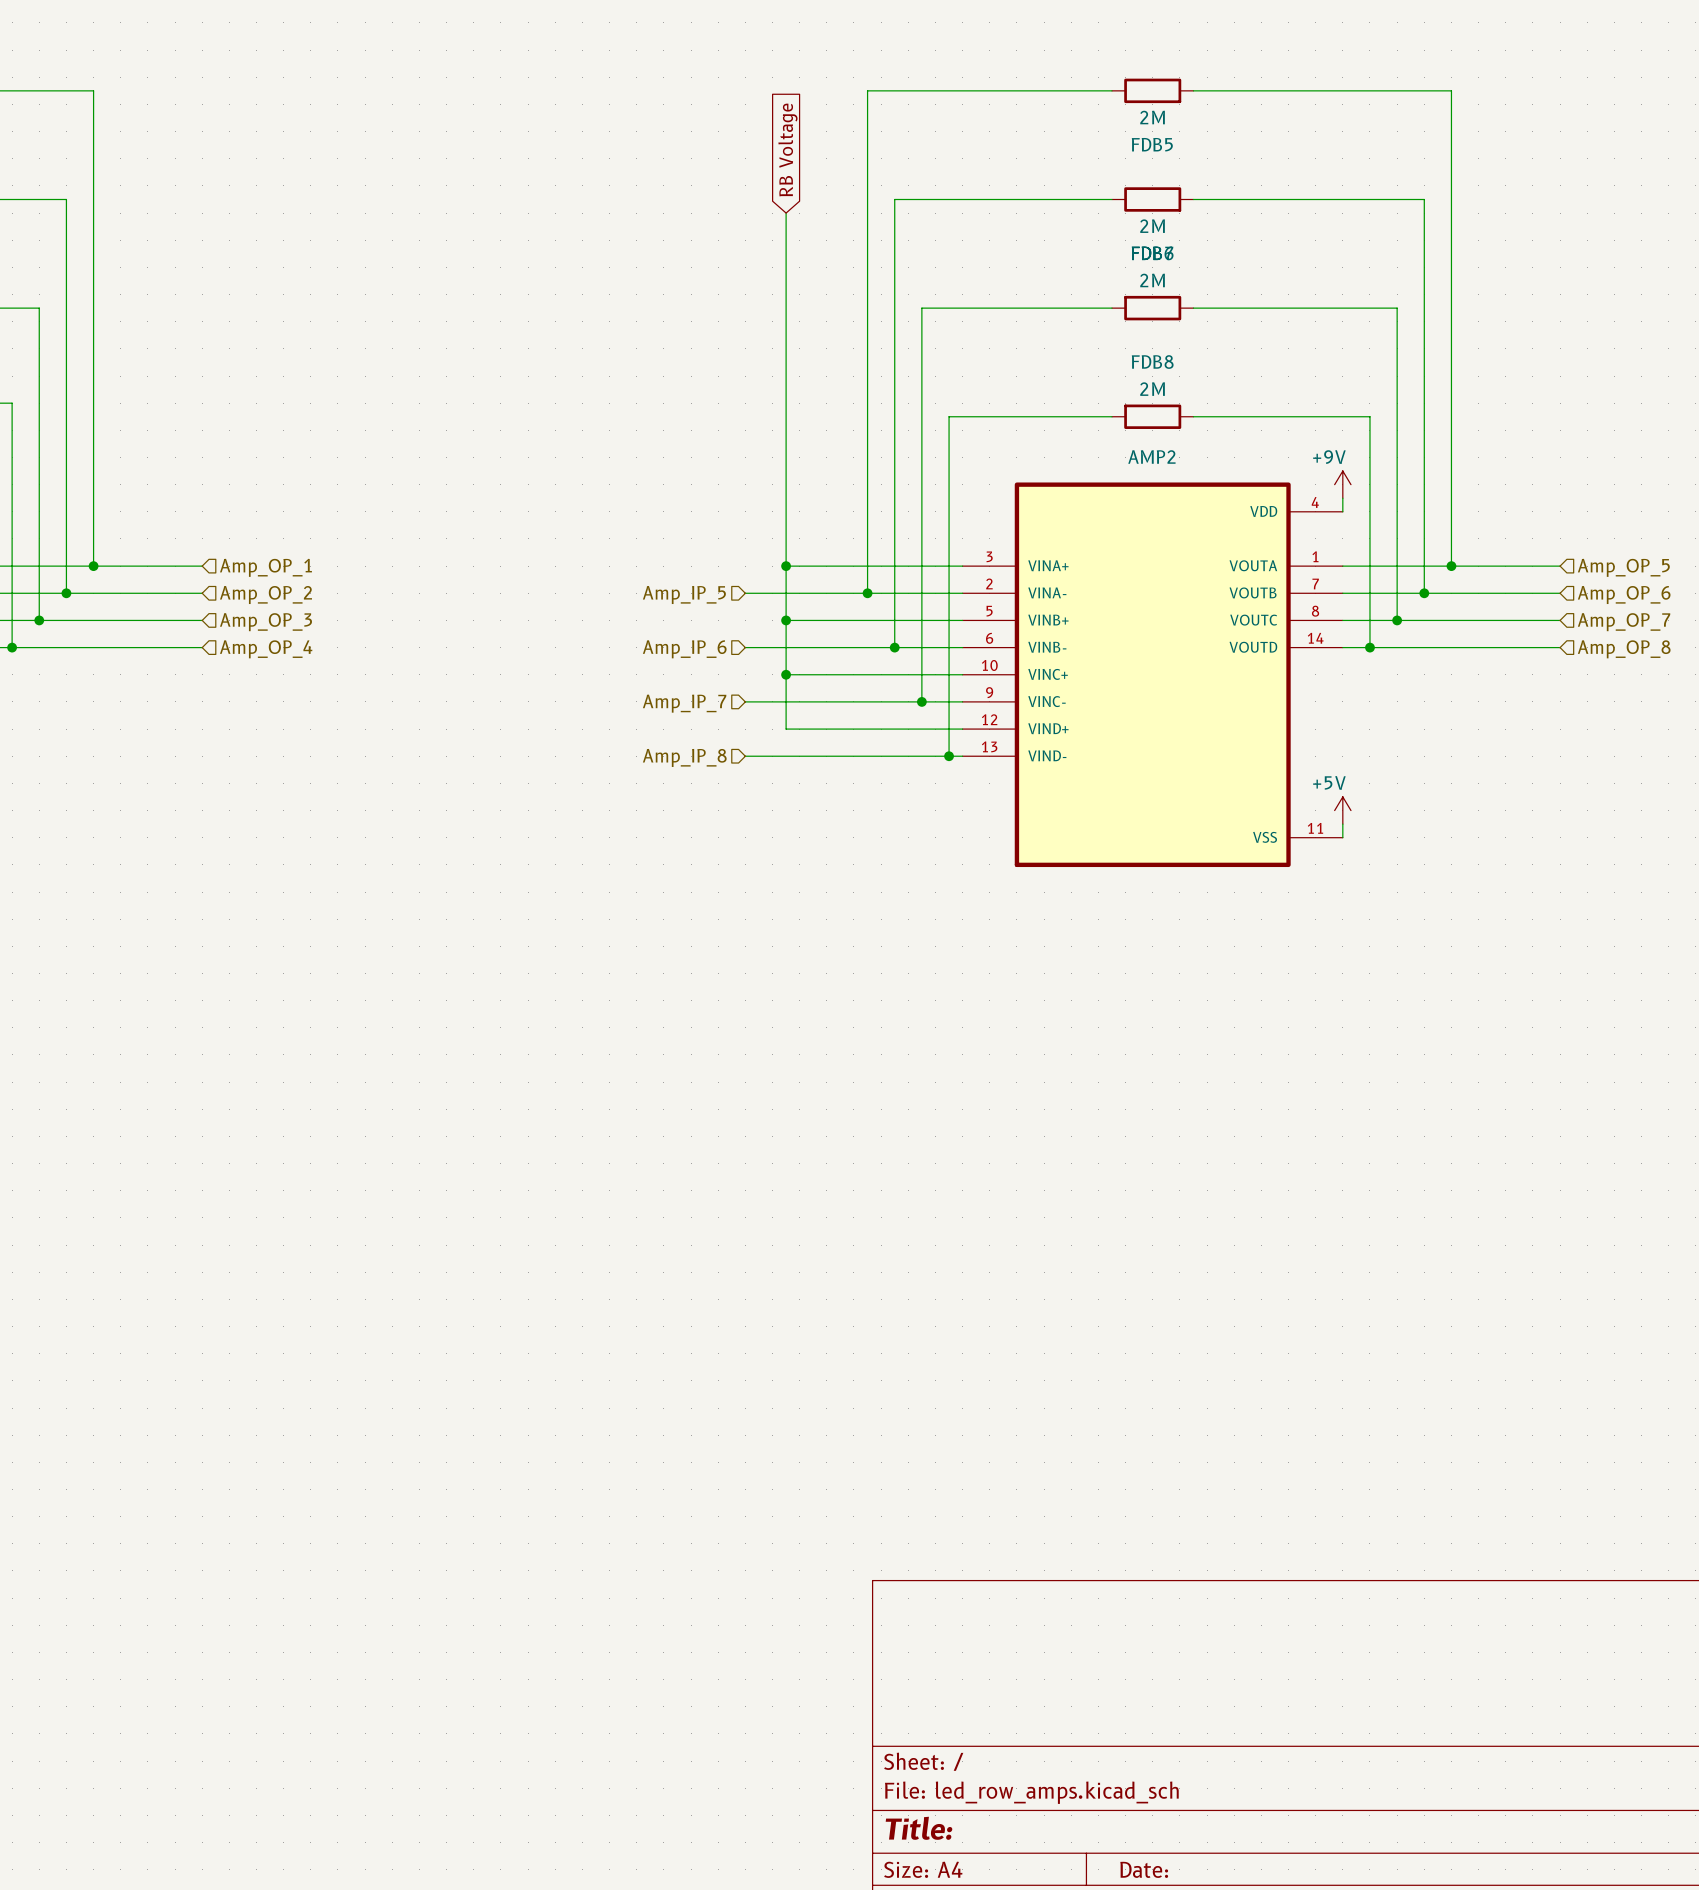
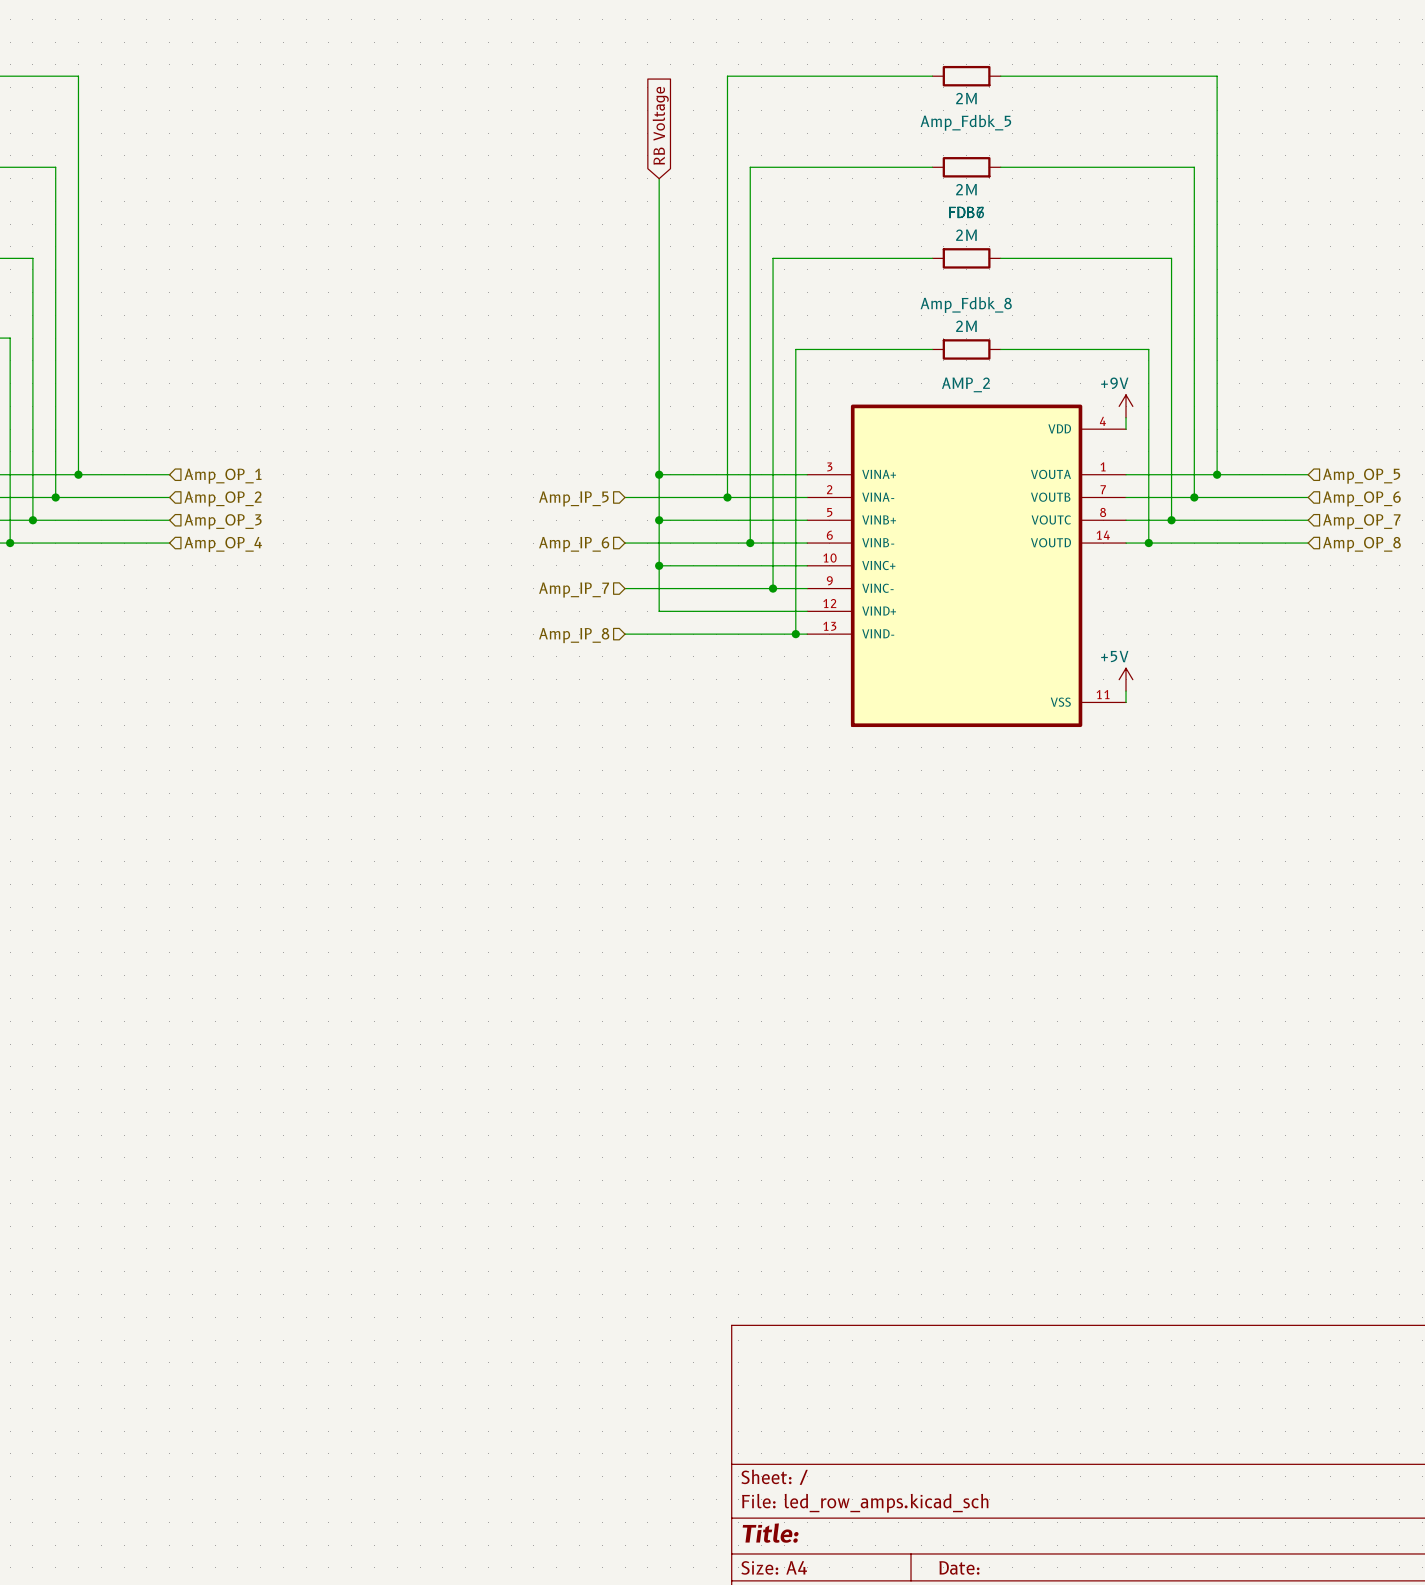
FDB5 name: FDB5 (1152, 144) -> Amp_Fdbk_5 (965, 122)
FDB8 name: FDB8 (1152, 362) -> Amp_Fdbk_8 (966, 304)
AMP2 name: AMP2 (1151, 456) -> AMP_2 (965, 384)

